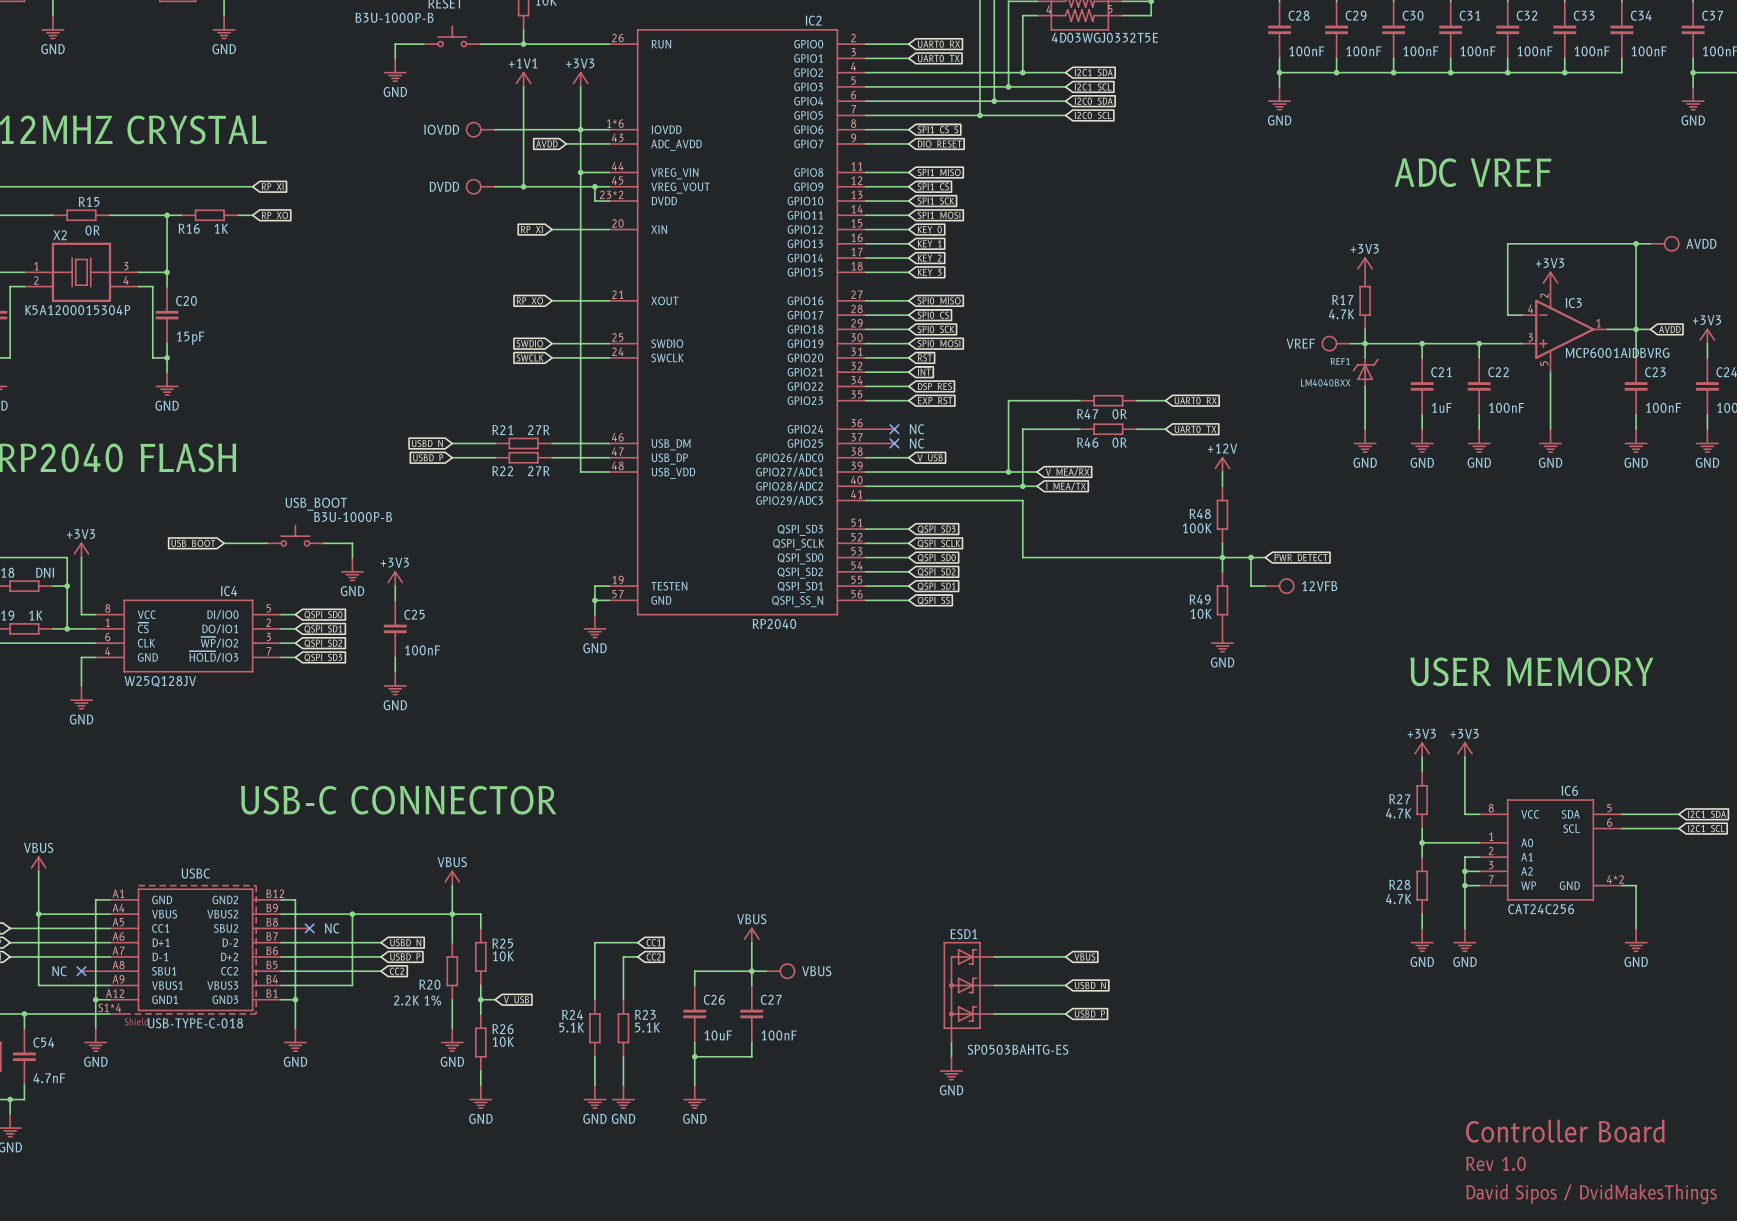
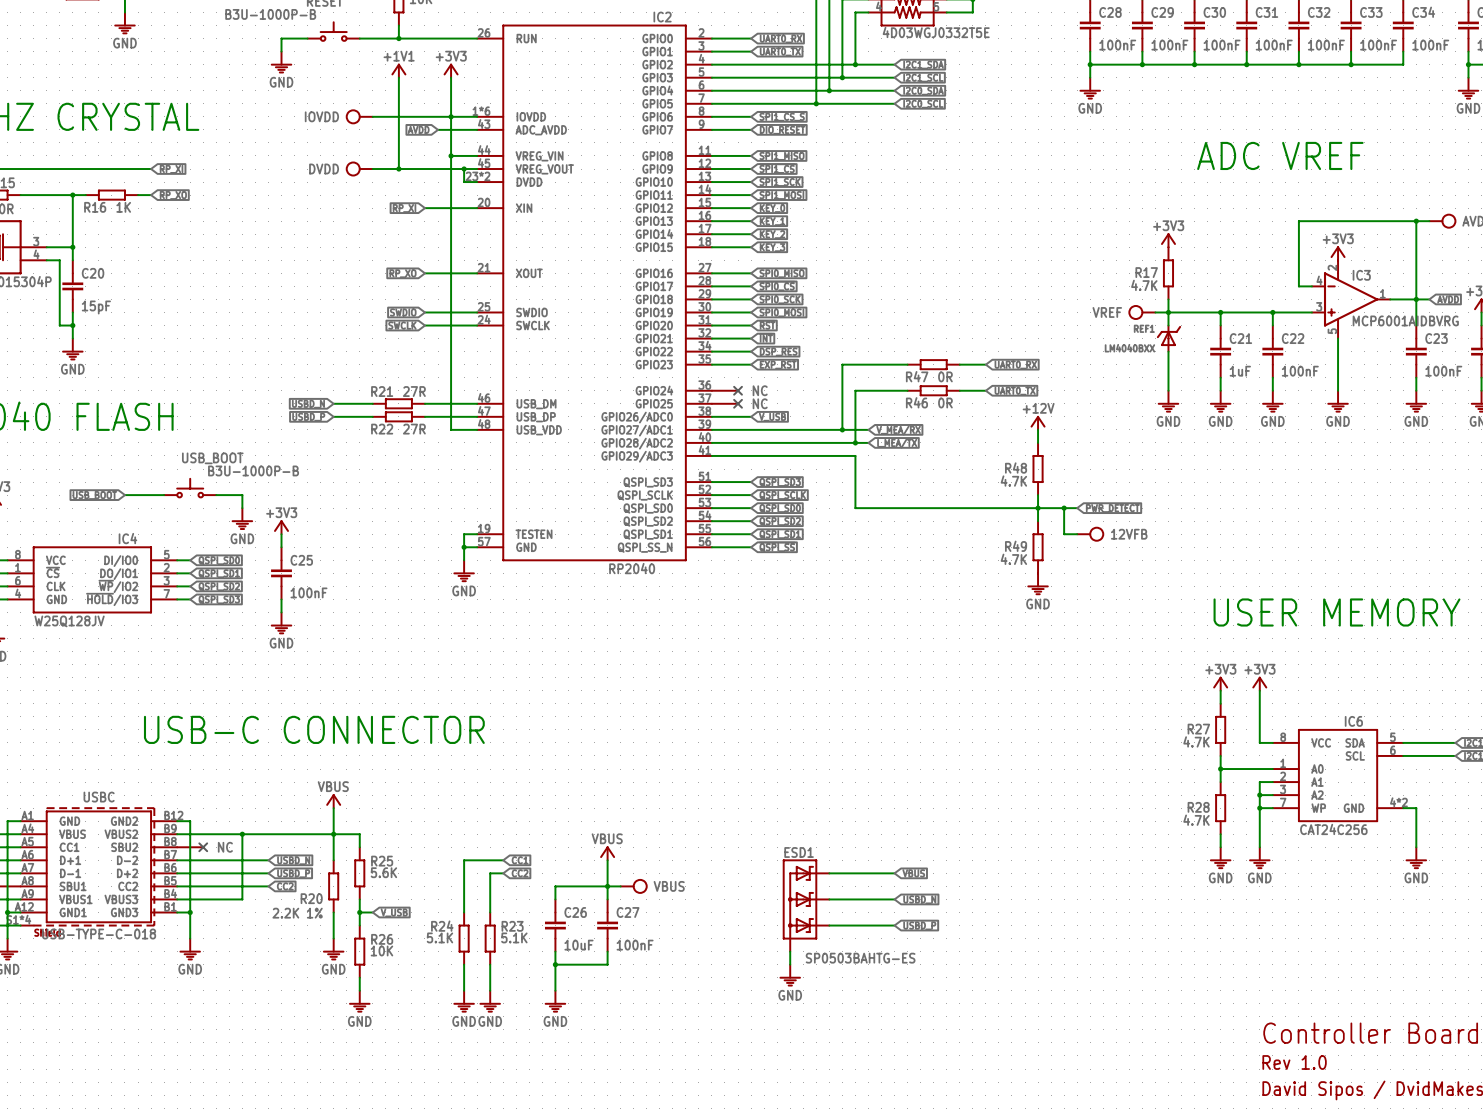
R48 value: 100K (1197, 528) -> 4.7K (1013, 481)
R49 value: 10K (1201, 613) -> 4.7K (1013, 559)
R25 value: 10K (503, 956) -> 5.6K (383, 872)

